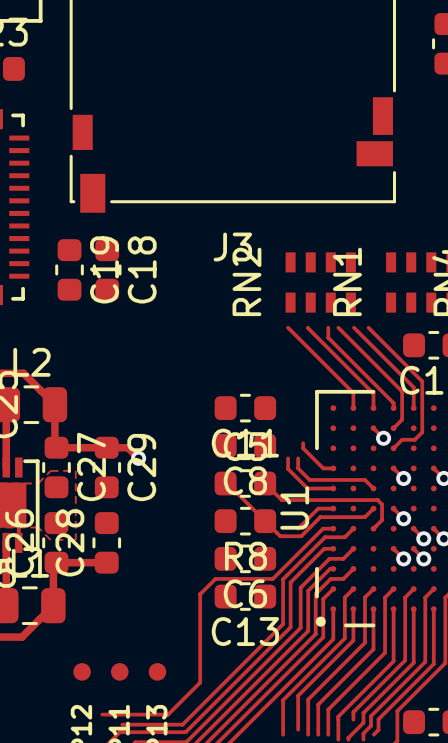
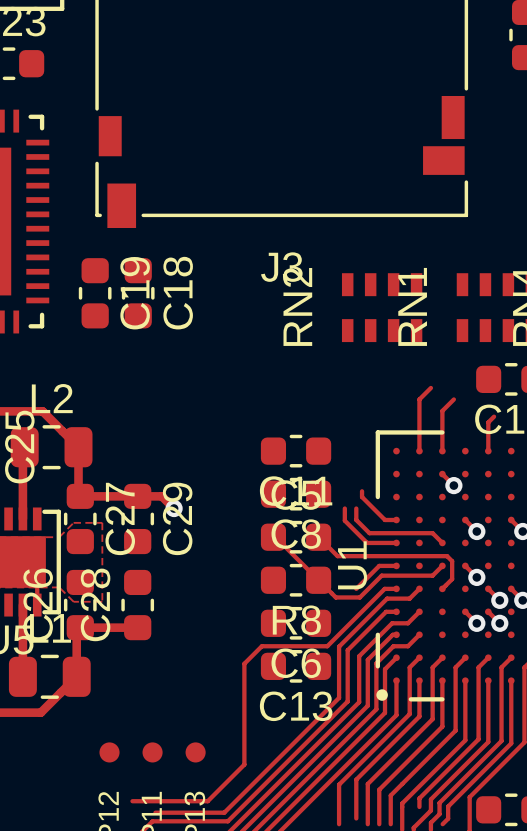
track: (288, 327) (353, 393) -> (430, 387) (419, 399) (419, 433)
track: (308, 327) (373, 393) -> (453, 399) (442, 410) (442, 434)
track: (328, 327) (328, 337) (393, 403) (393, 408) -> none
track: (338, 327) (402, 391) (402, 419) (393, 428) -> none
track: (354, 327) (413, 387) -> (494, 416) (488, 422) (488, 427)
track: (368, 327) (422, 381) (422, 432) (414, 439) (402, 439) (393, 448) -> none

